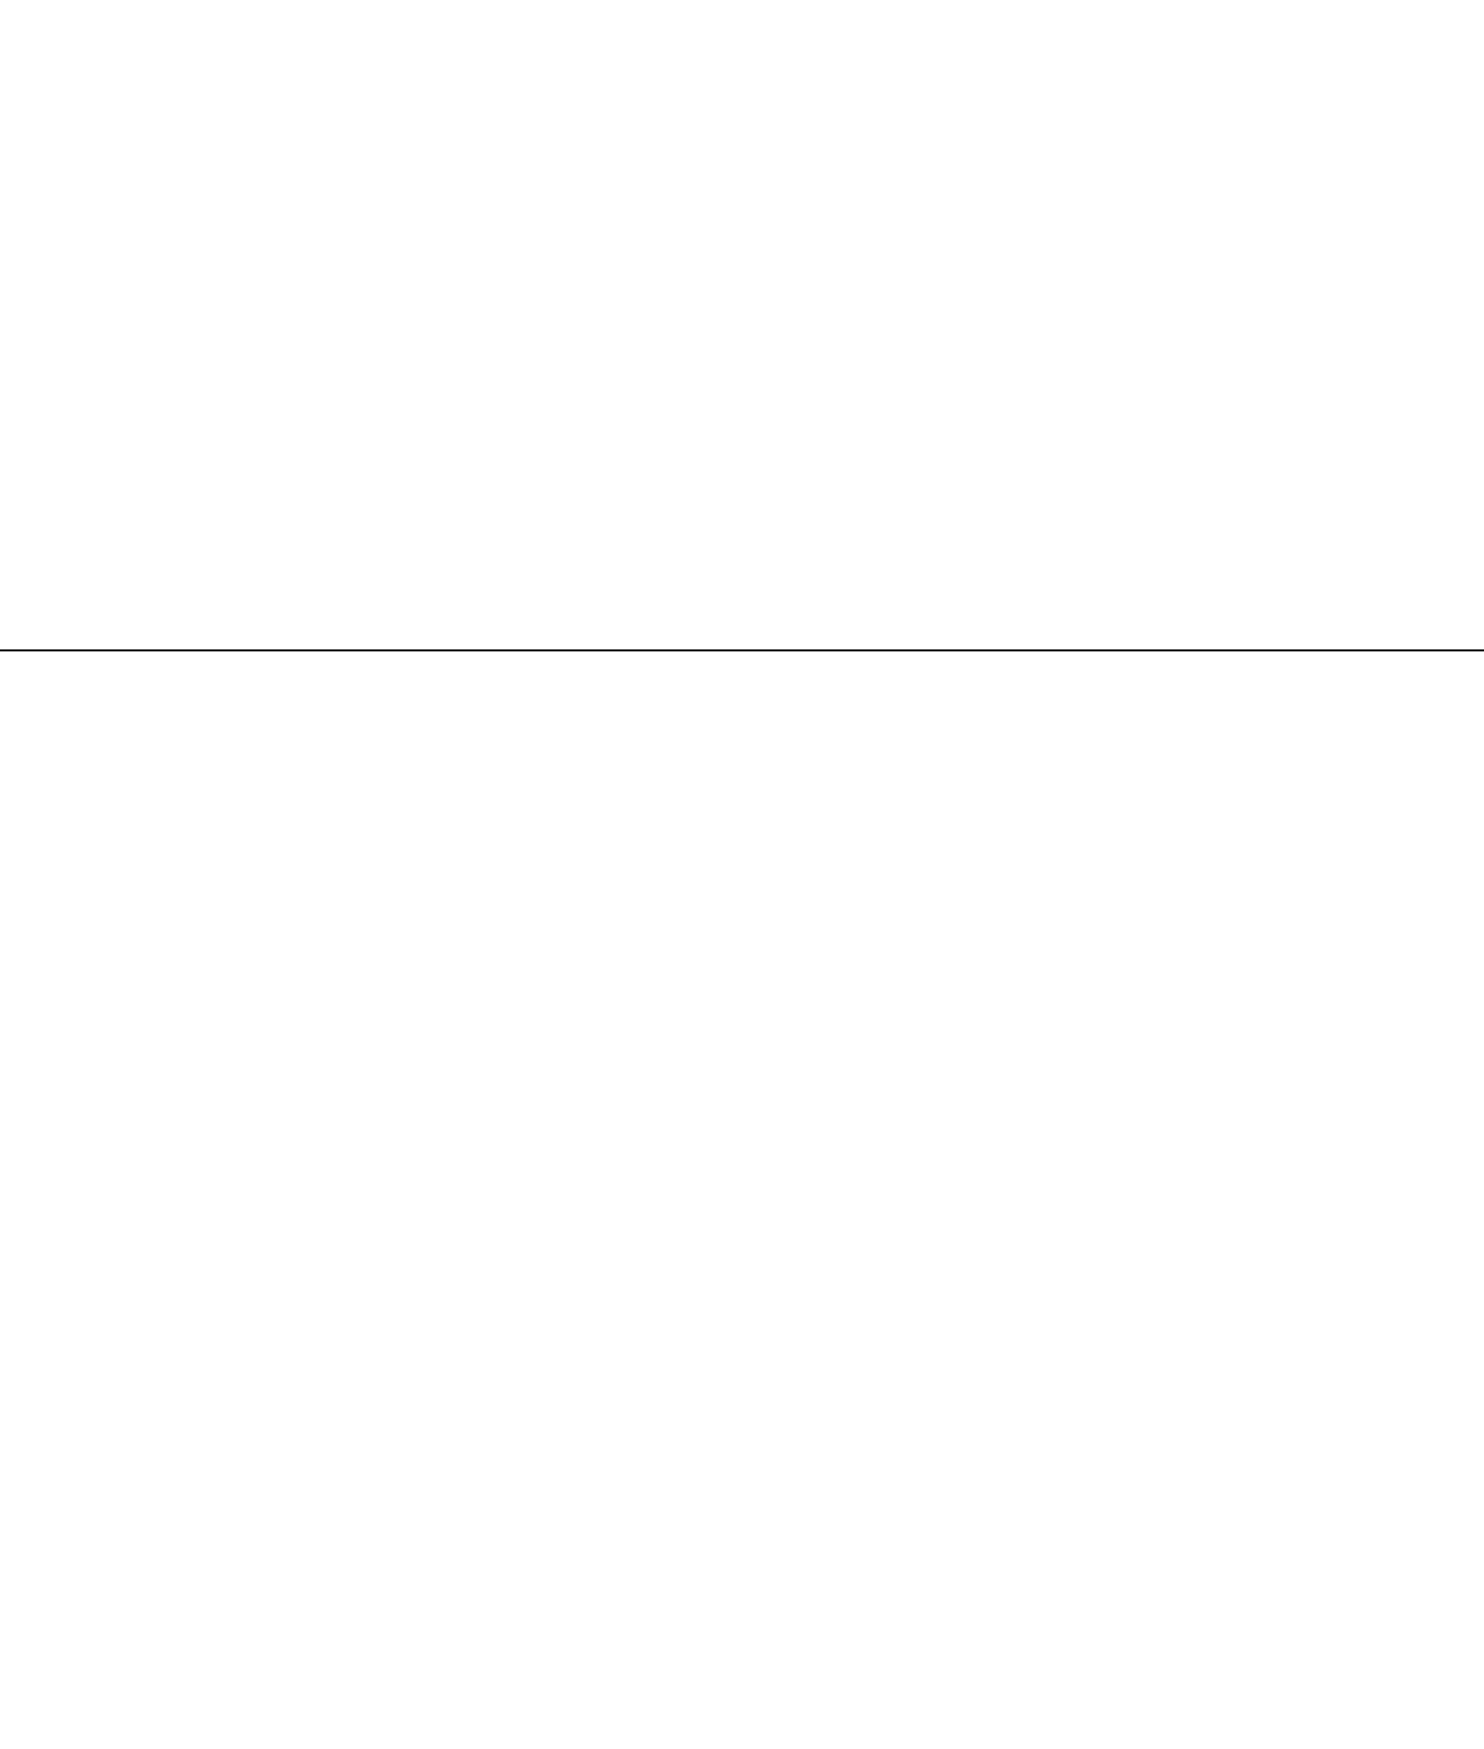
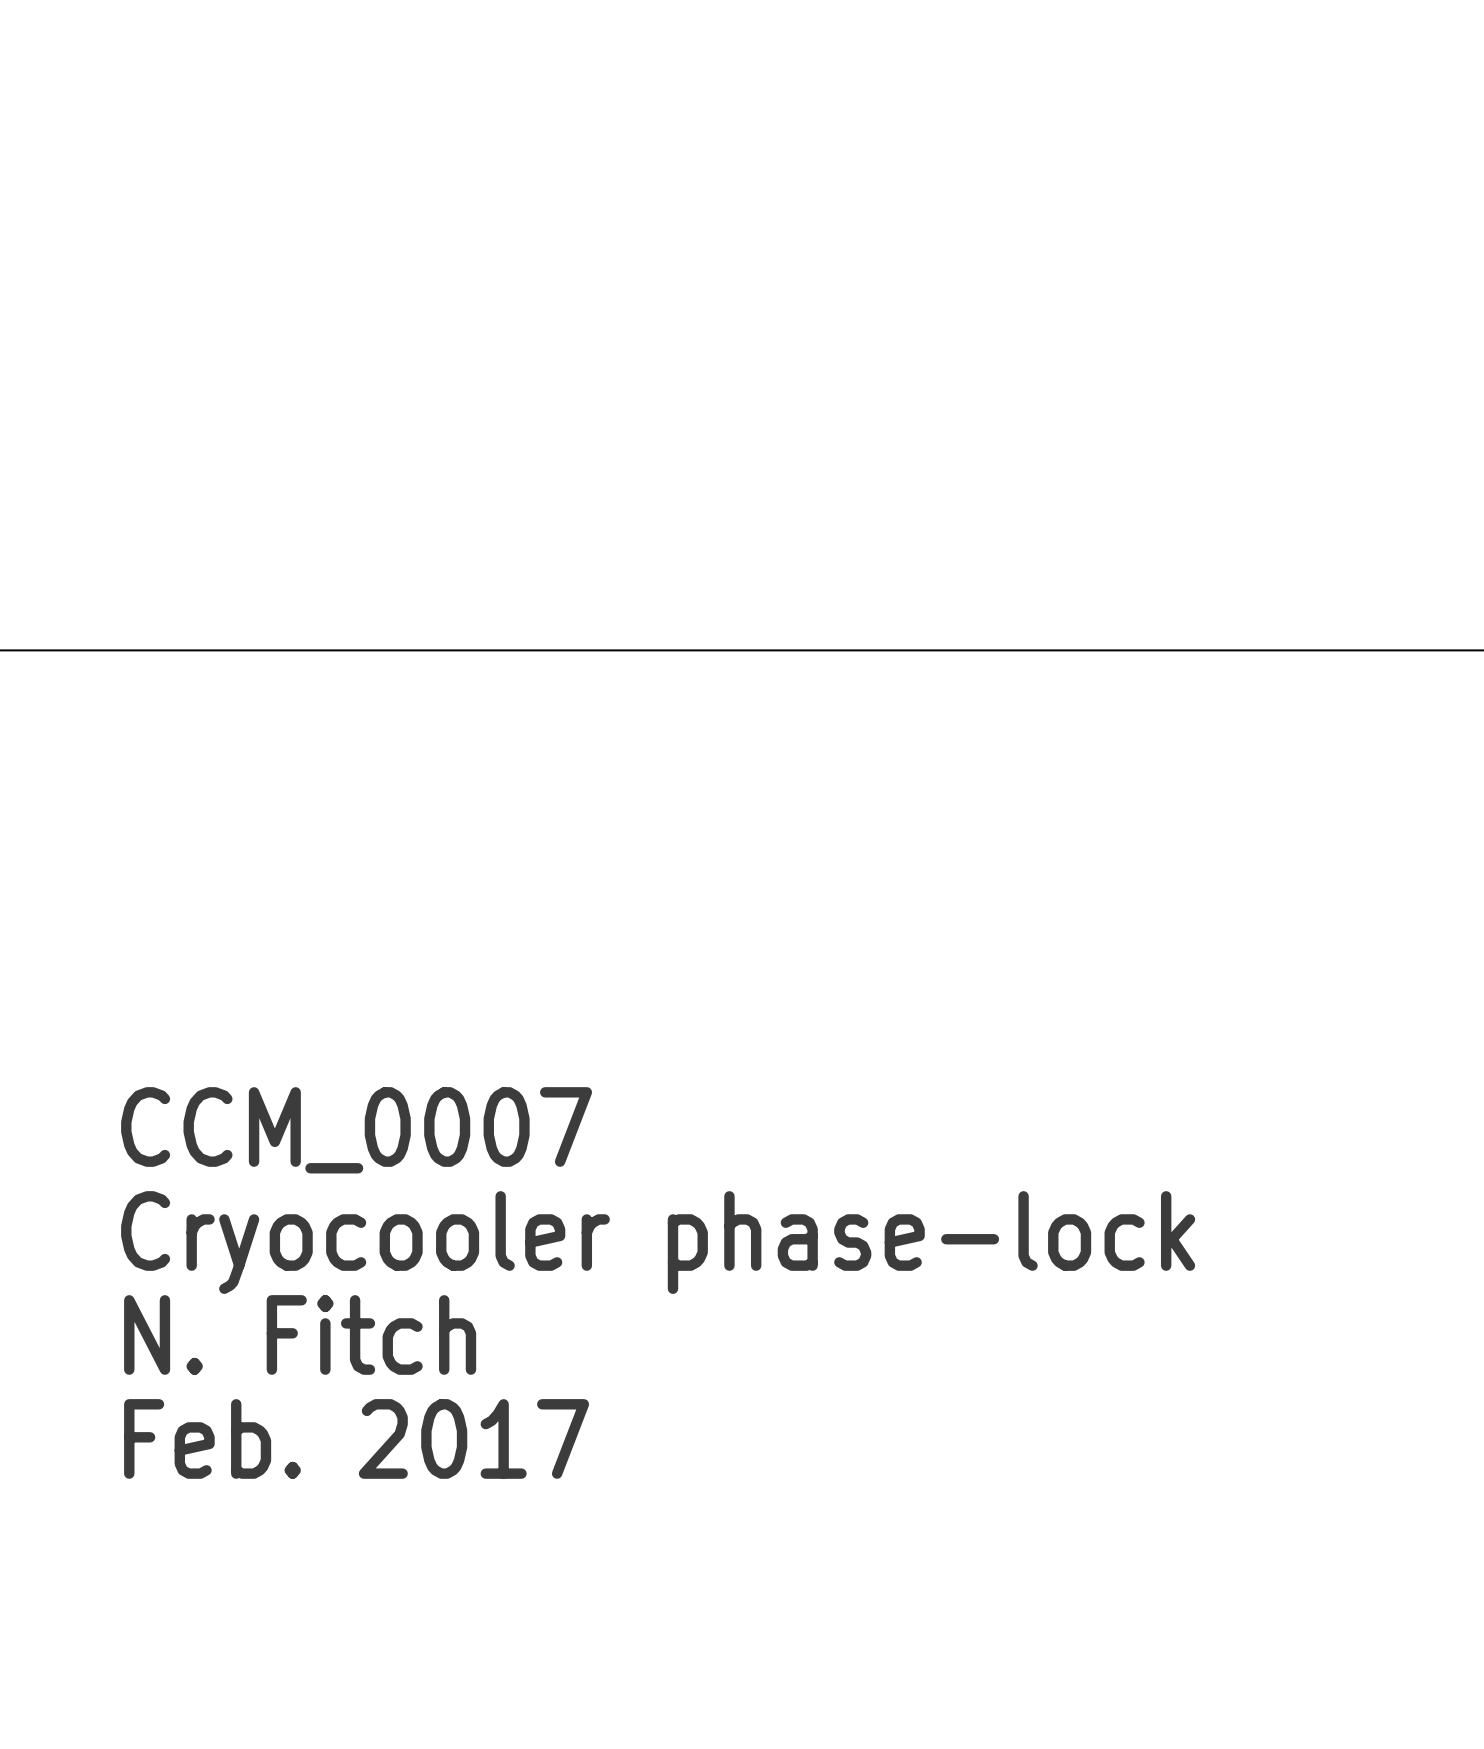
text: none -> CCM_0007 (356, 1130)
text: none -> Cryocooler phase-lock (658, 1242)
text: none -> N. Fitch (300, 1334)
text: none -> Feb. 2017 (356, 1438)

